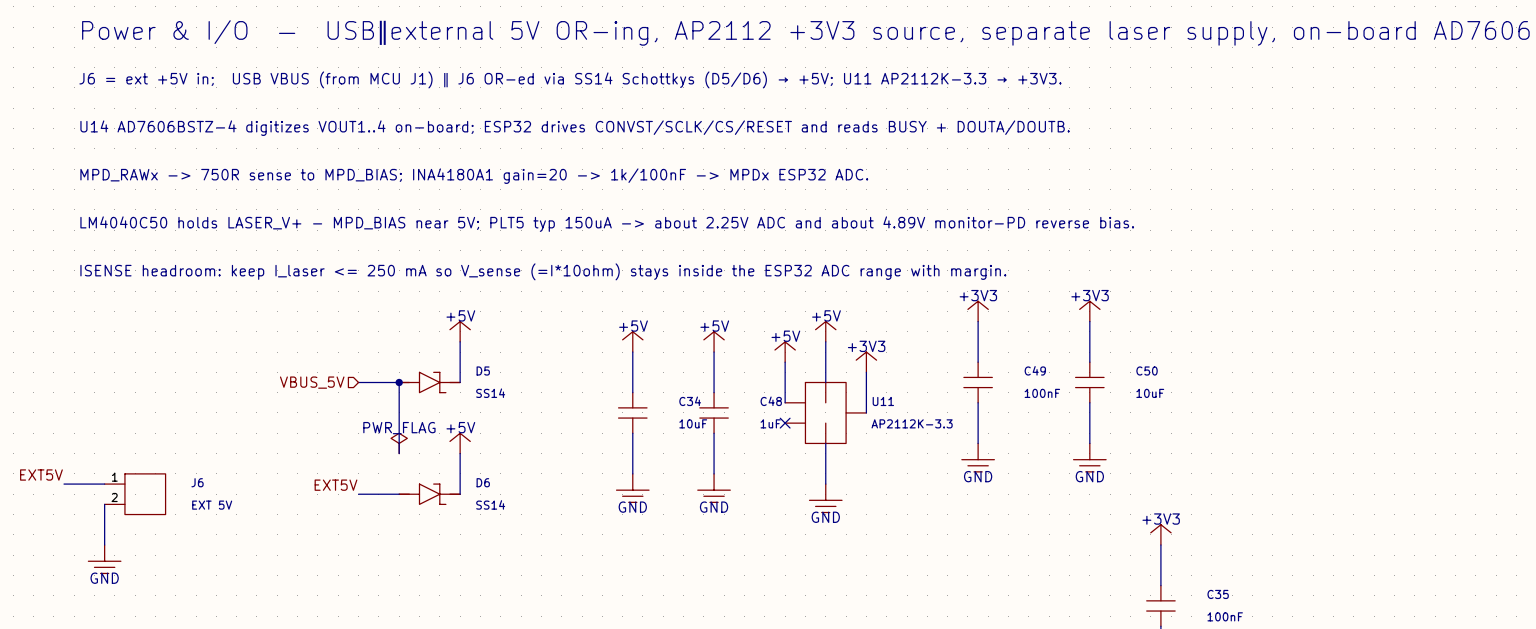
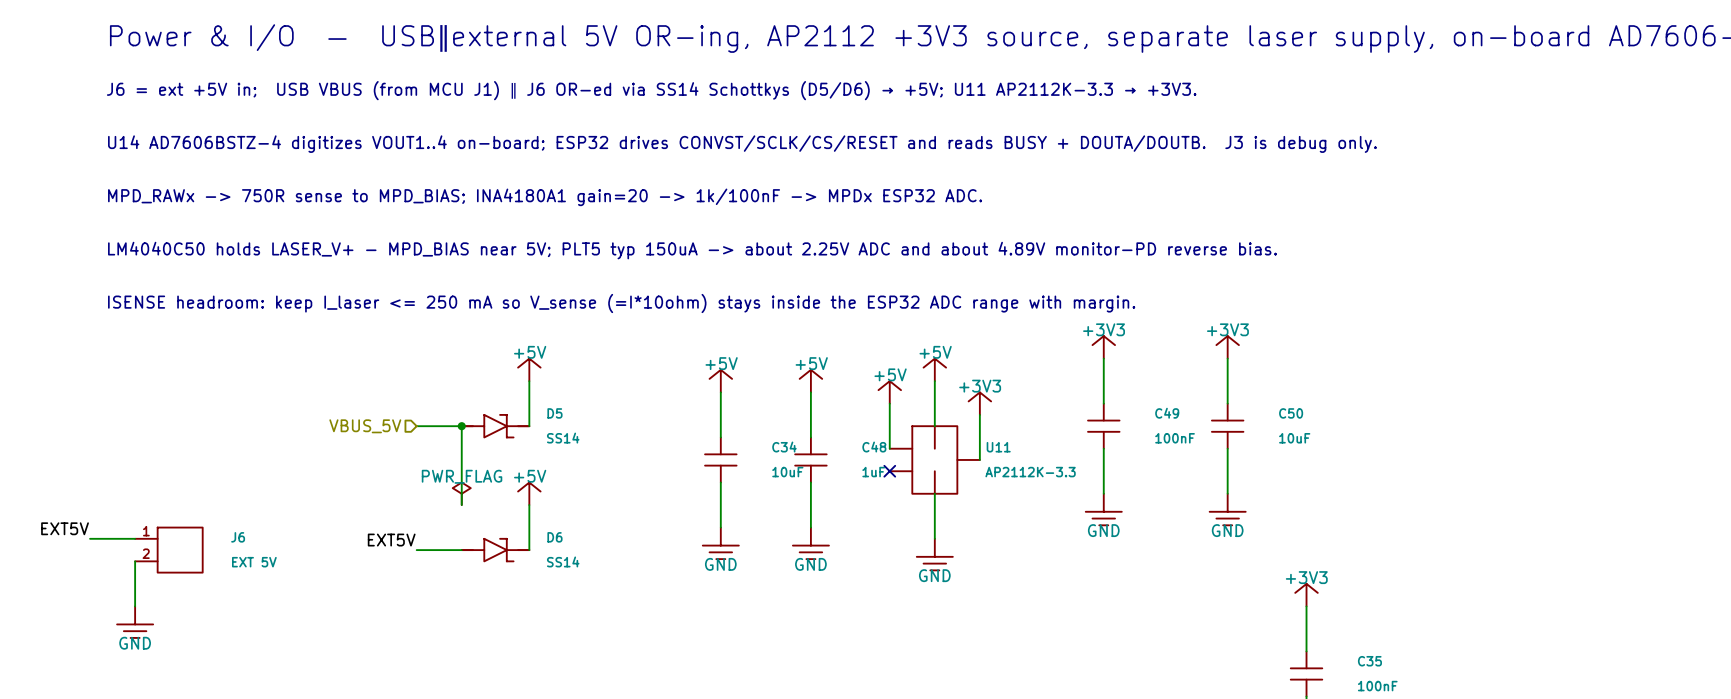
text: U14 AD7606BSTZ-4 digitizes VOUT1..4 on-board; ESP32 drives CONVST/SCLK/CS/RESET and reads BUSY + DOUTA/DOUTB. (575, 128) -> U14 AD7606BSTZ-4 digitizes VOUT1..4 on-board; ESP32 drives CONVST/SCLK/CS/RESET and reads BUSY + DOUTA/DOUTB. J3 is debug only. (742, 144)

